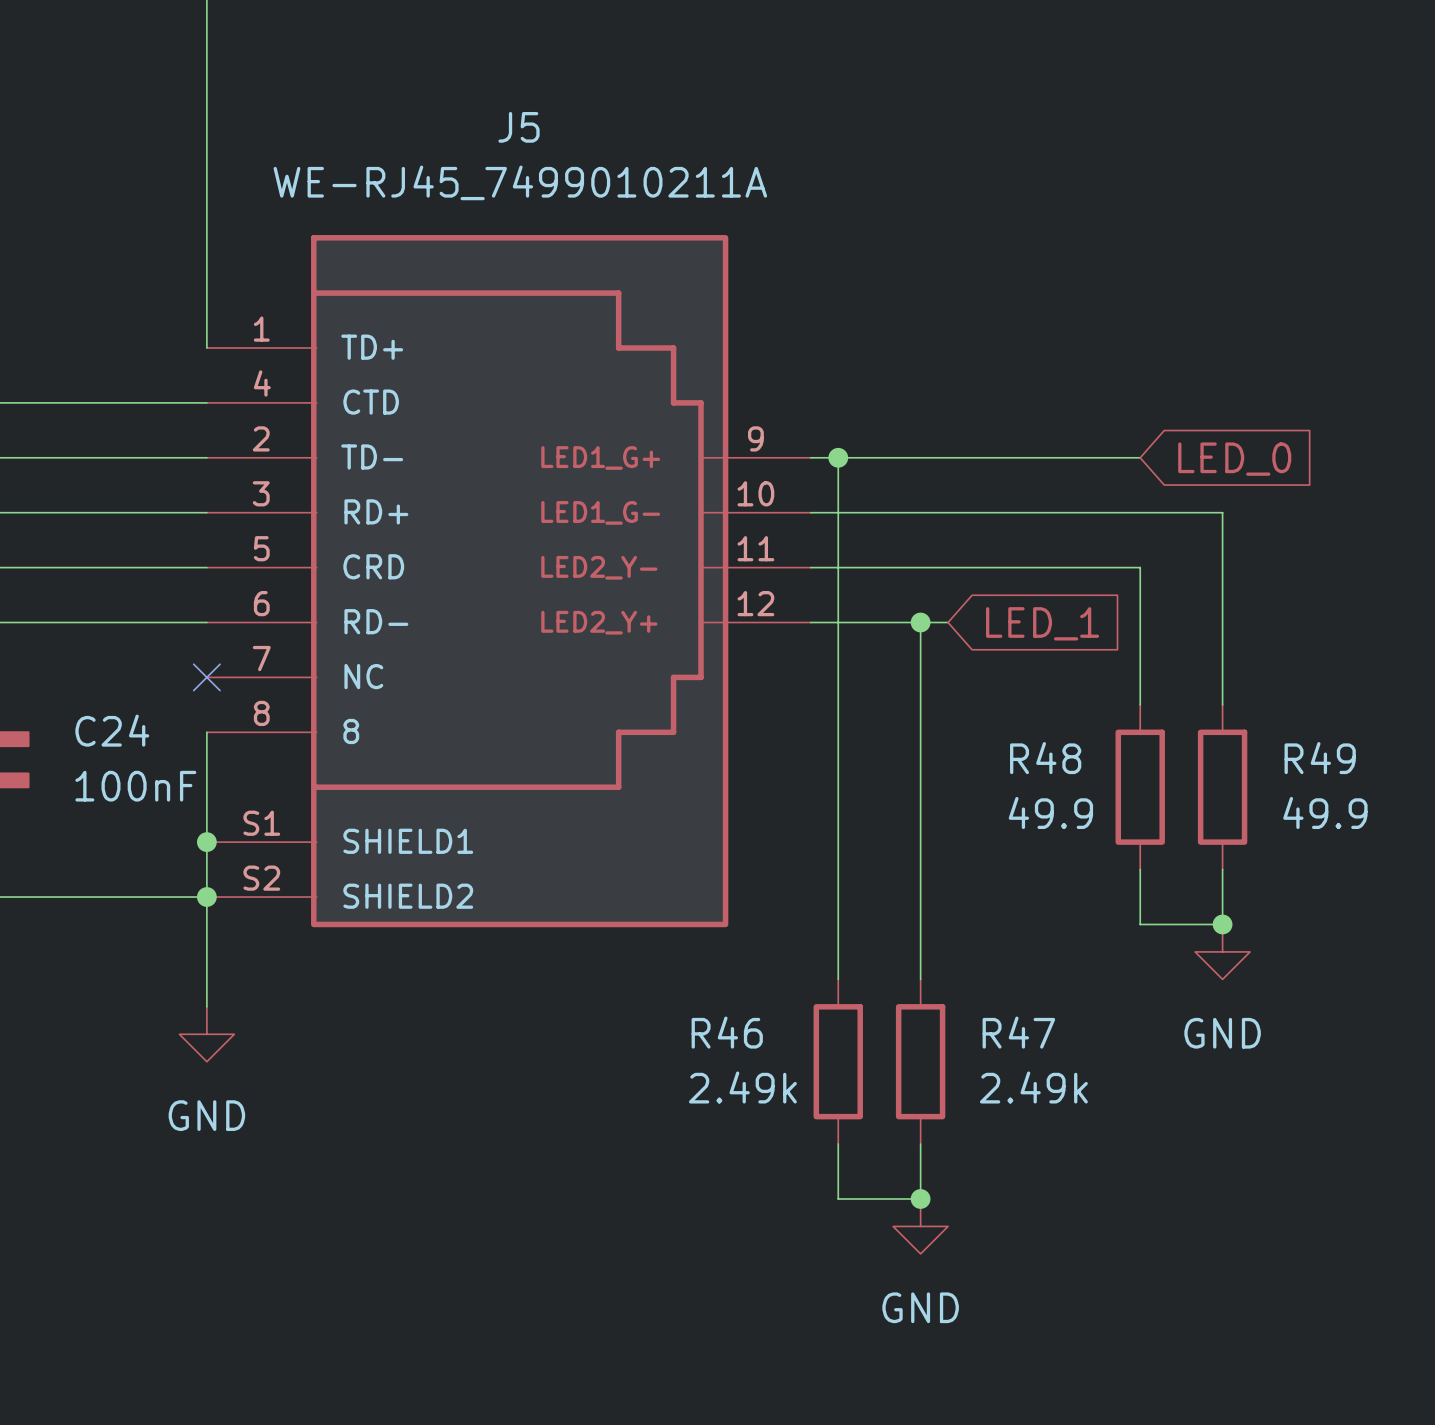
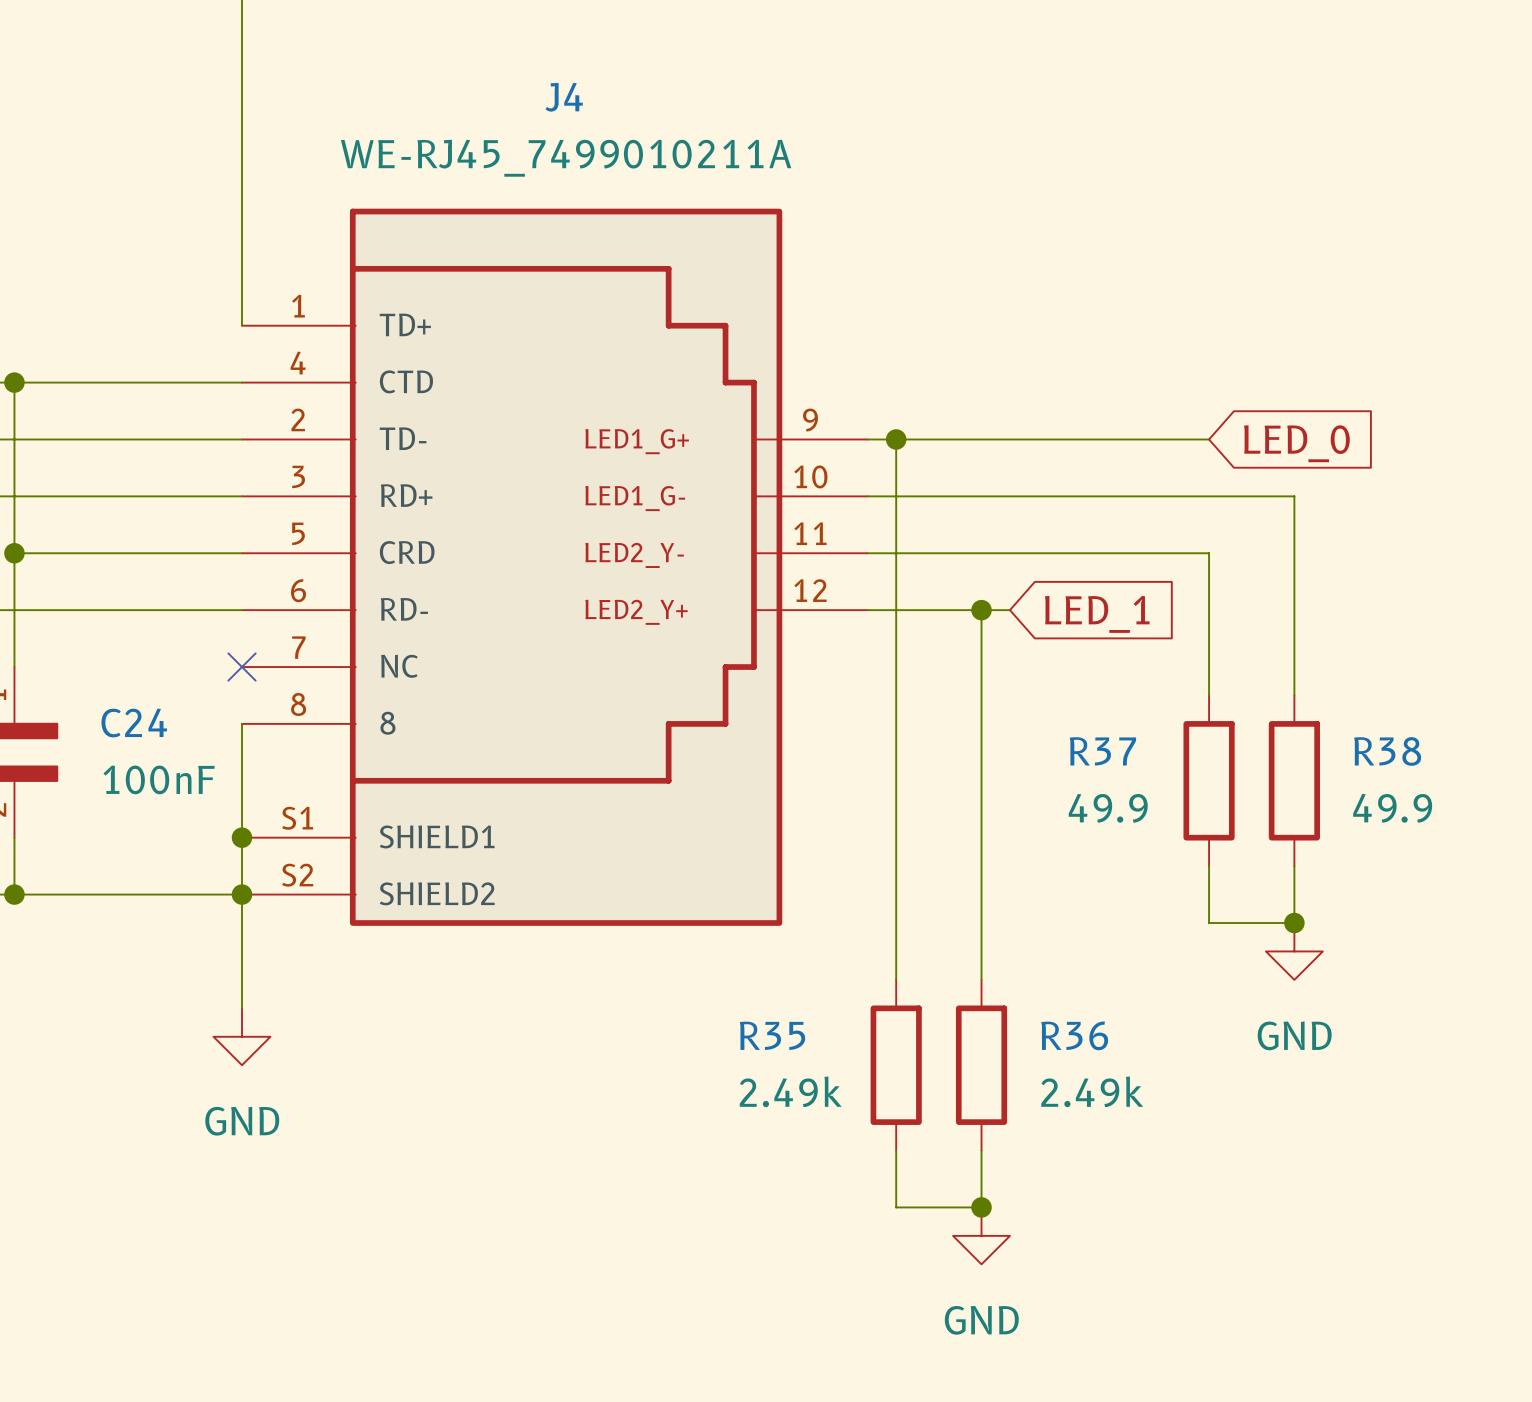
J5 name: J5 (519, 127) -> J4 (564, 97)
R48 name: R48 (1045, 758) -> R37 (1102, 751)
R49 name: R49 (1320, 758) -> R38 (1387, 751)
R46 name: R46 (727, 1032) -> R35 (772, 1035)
R47 name: R47 (1018, 1032) -> R36 (1074, 1035)

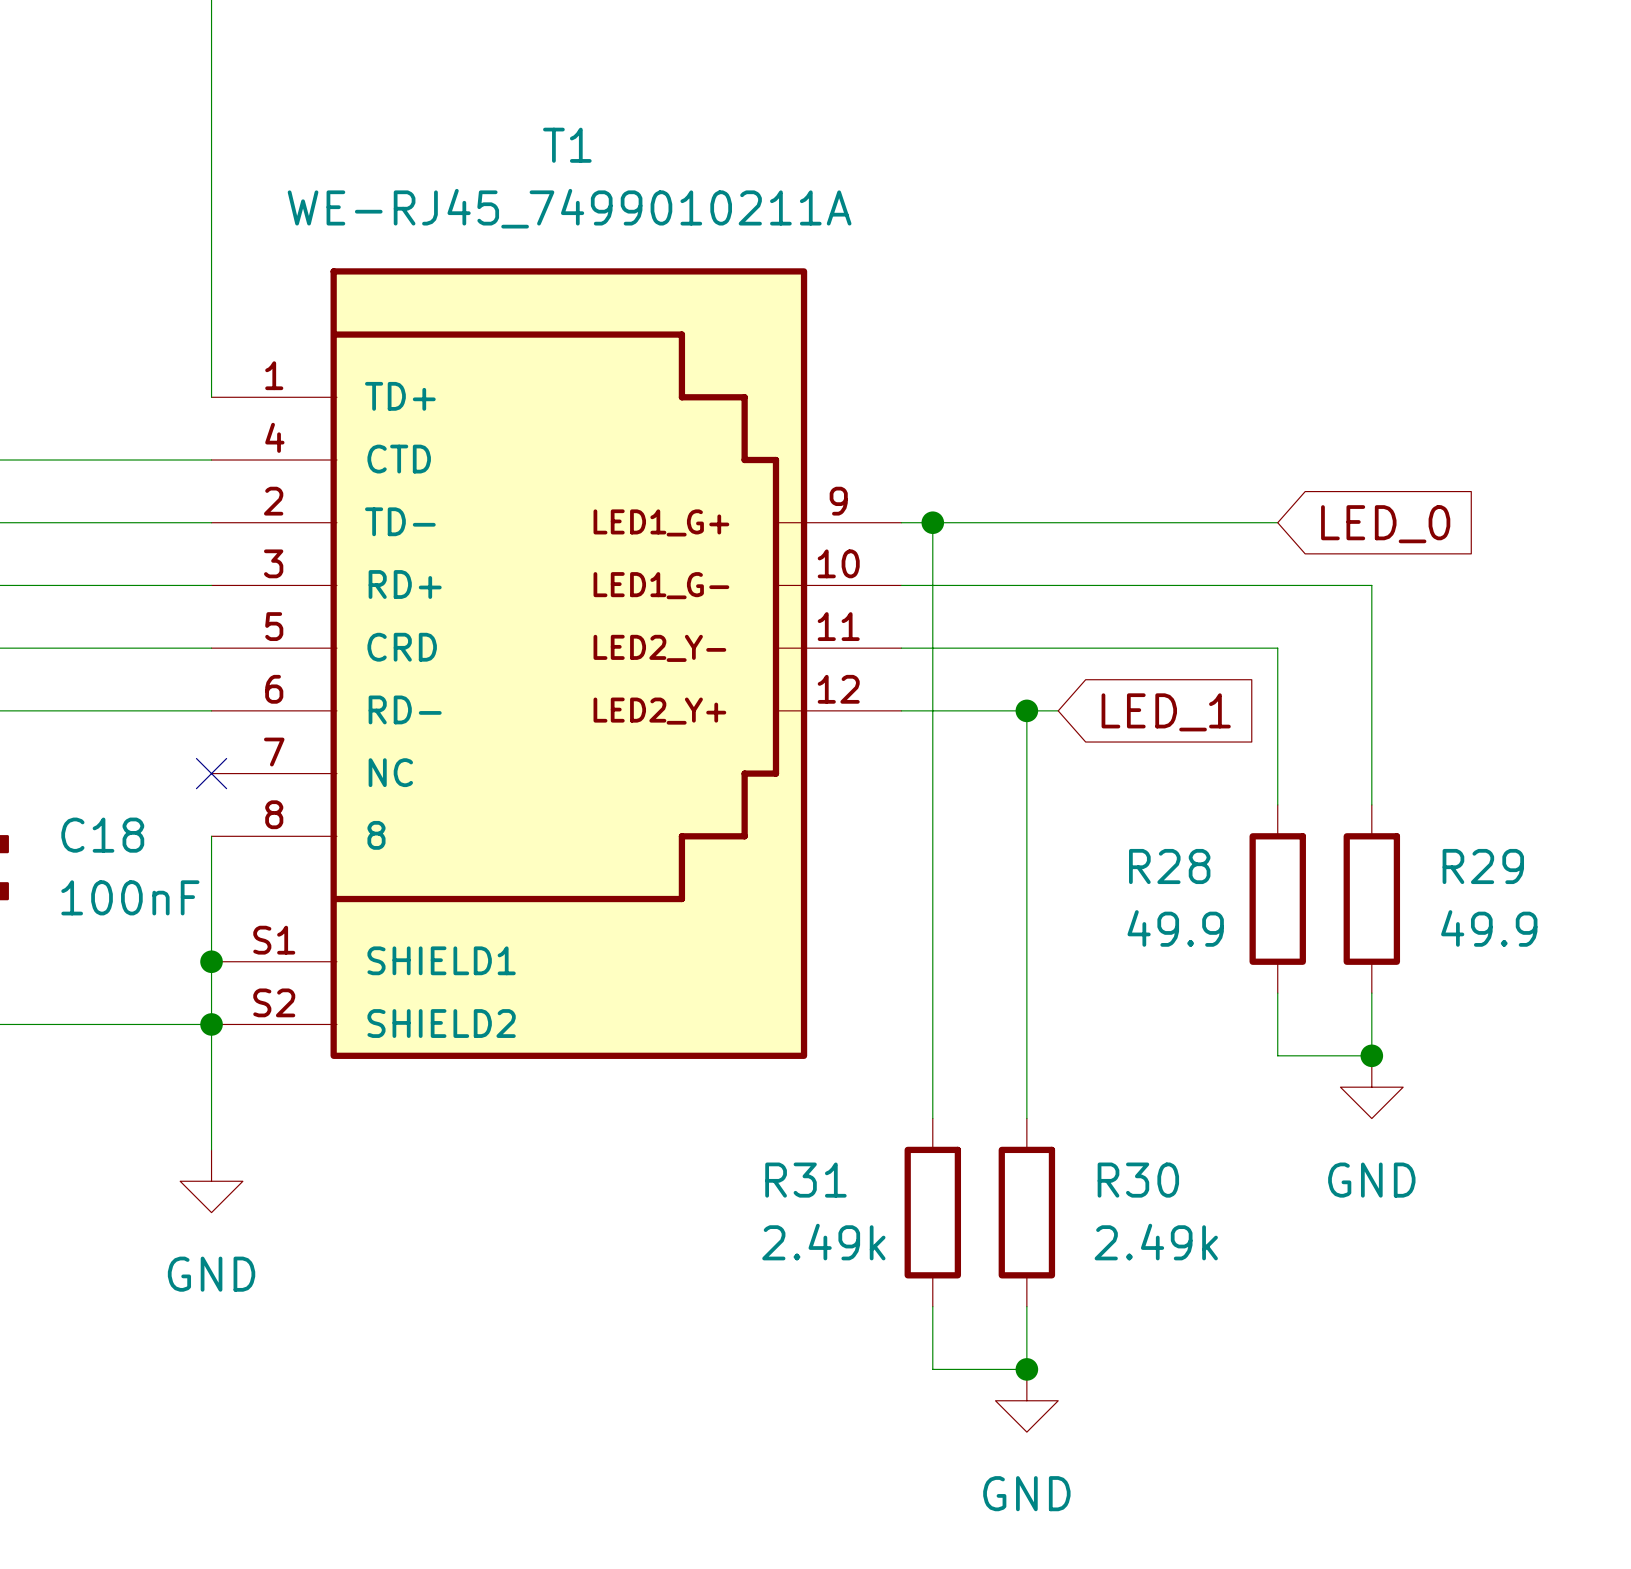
J4 name: J4 (564, 97) -> T1 (567, 145)
C24 name: C24 (134, 723) -> C18 (102, 835)
R37 name: R37 (1102, 751) -> R28 (1169, 866)
R38 name: R38 (1387, 751) -> R29 (1483, 866)
R35 name: R35 (772, 1035) -> R31 (805, 1180)
R36 name: R36 (1074, 1035) -> R30 (1138, 1180)

